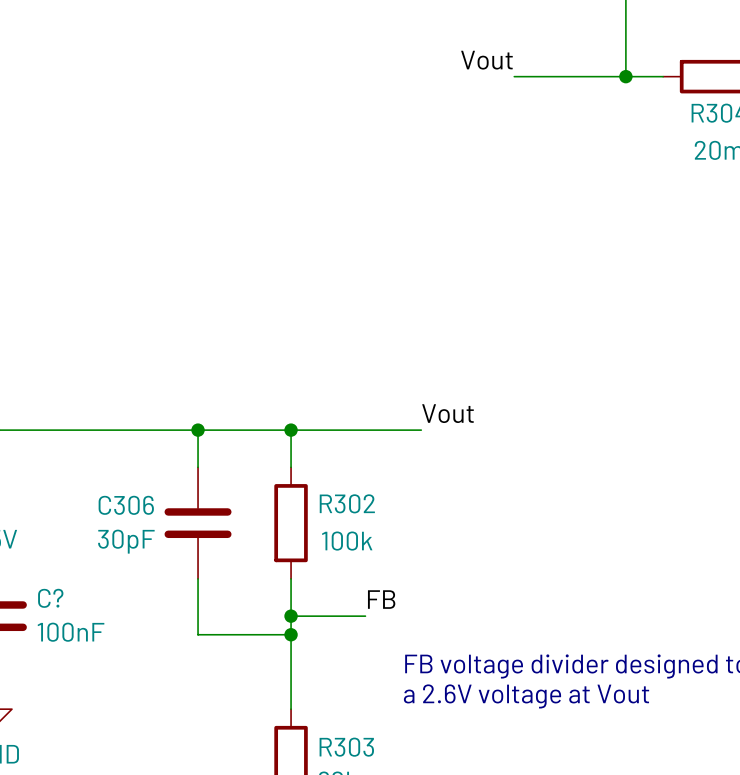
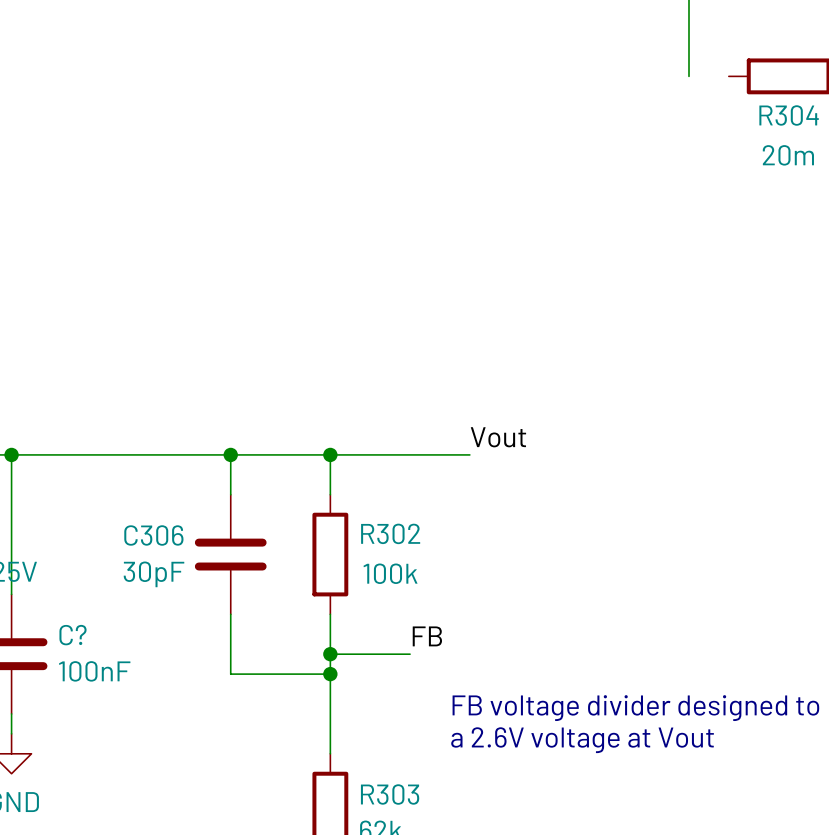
label: Vout (486, 60) -> none
wire: (514, 76) (663, 76) -> none
junction: (625, 76) -> none

